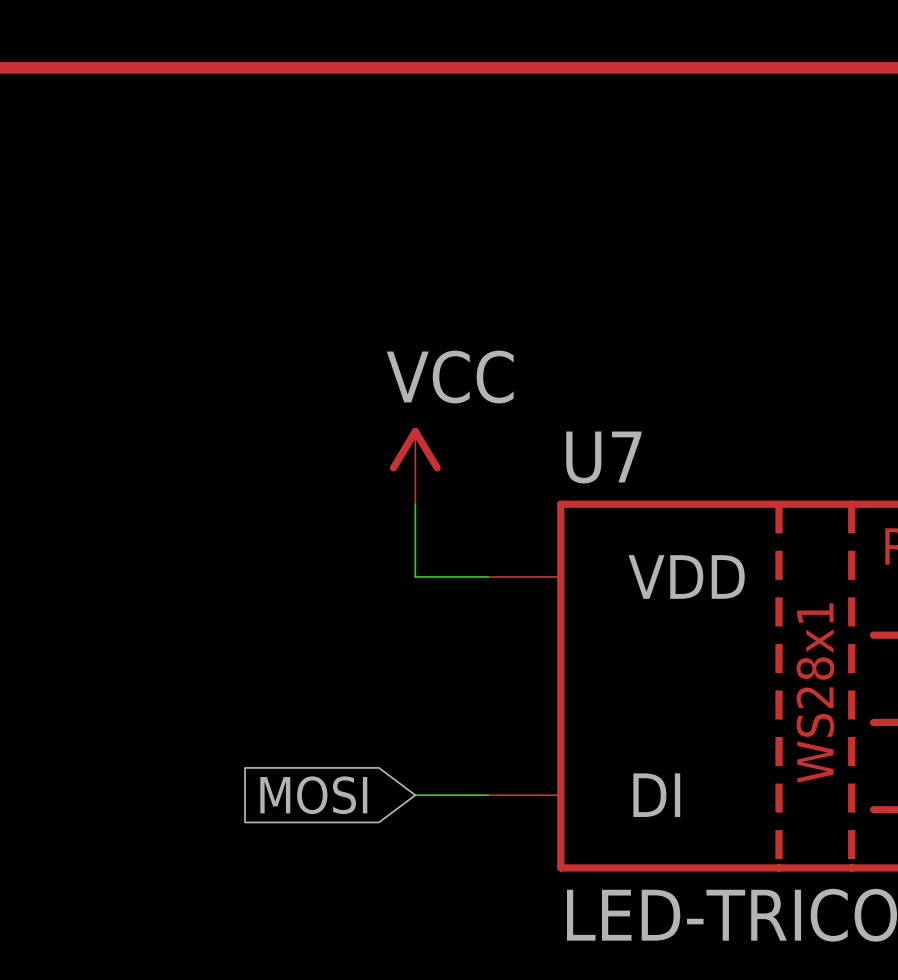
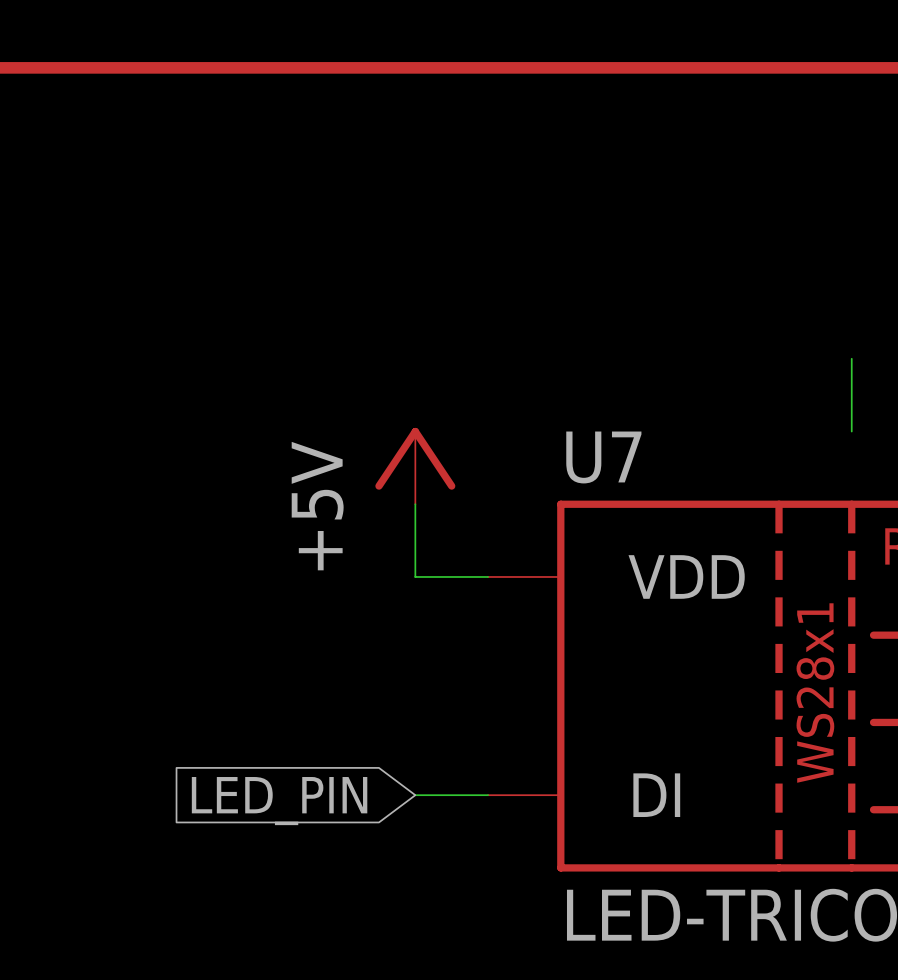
wire: none -> (851, 358) (851, 431)
power symbol: VCC (415, 466) -> +5V (415, 466)
global label: MOSI (313, 795) -> LED_PIN (279, 801)

